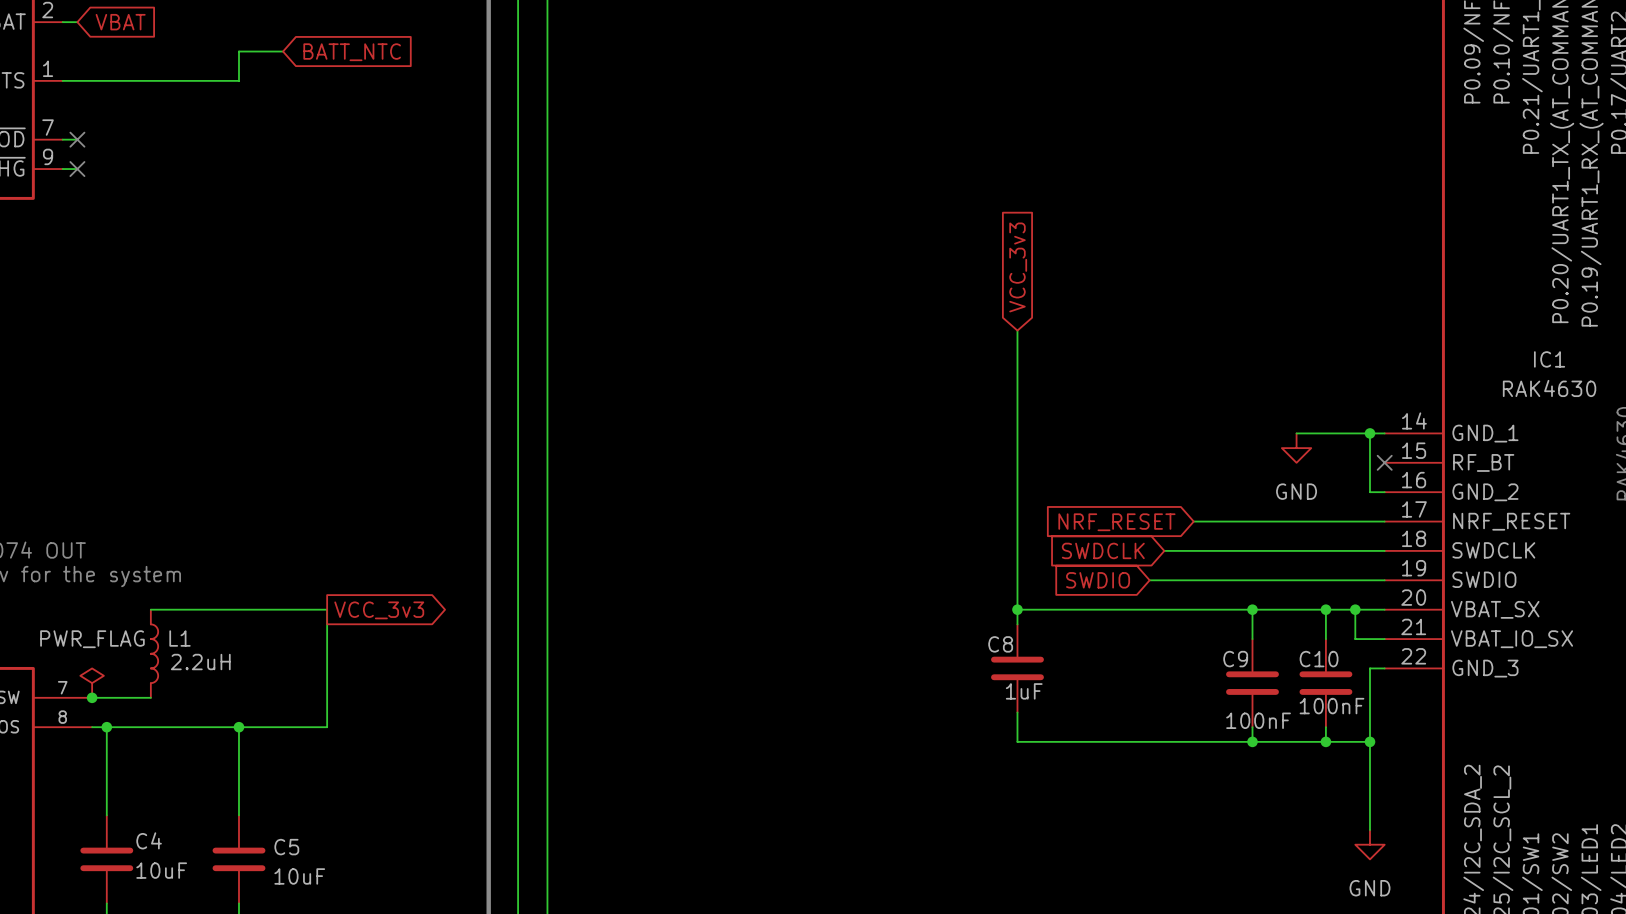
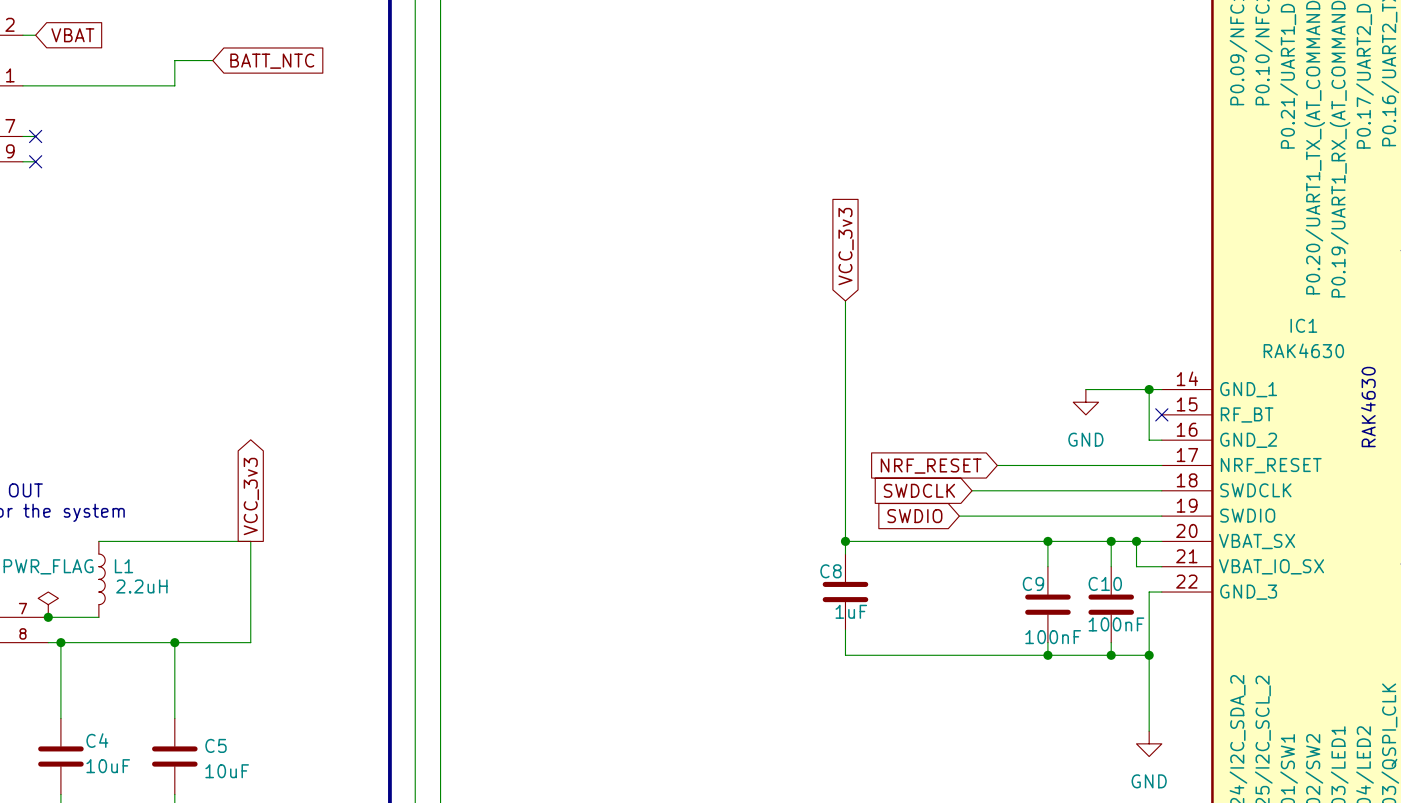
global label rotation: 0° (379, 610) -> 90° counterclockwise (251, 496)

